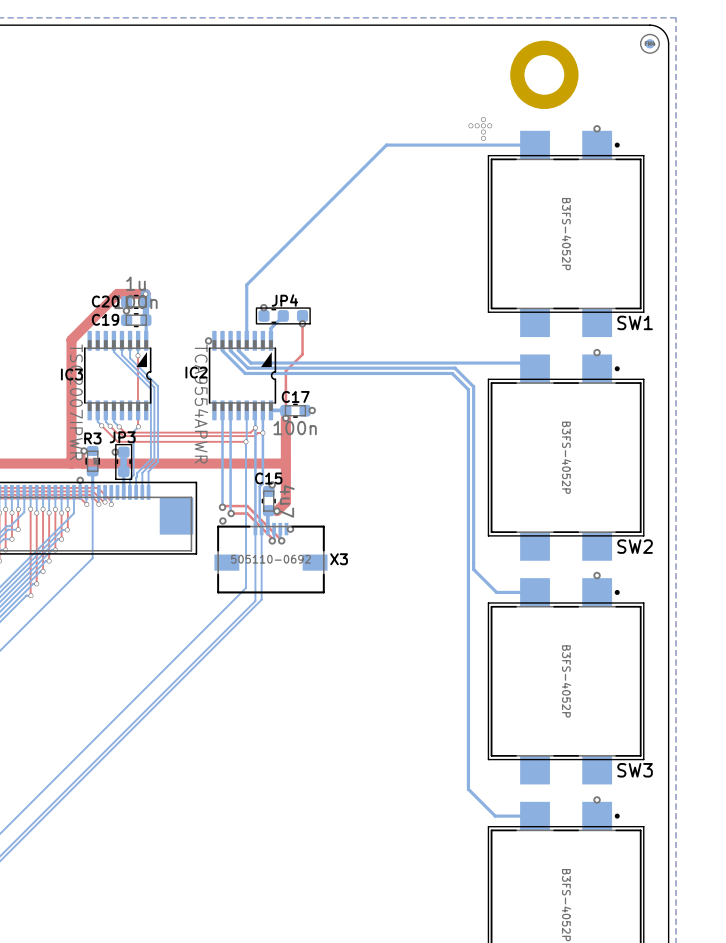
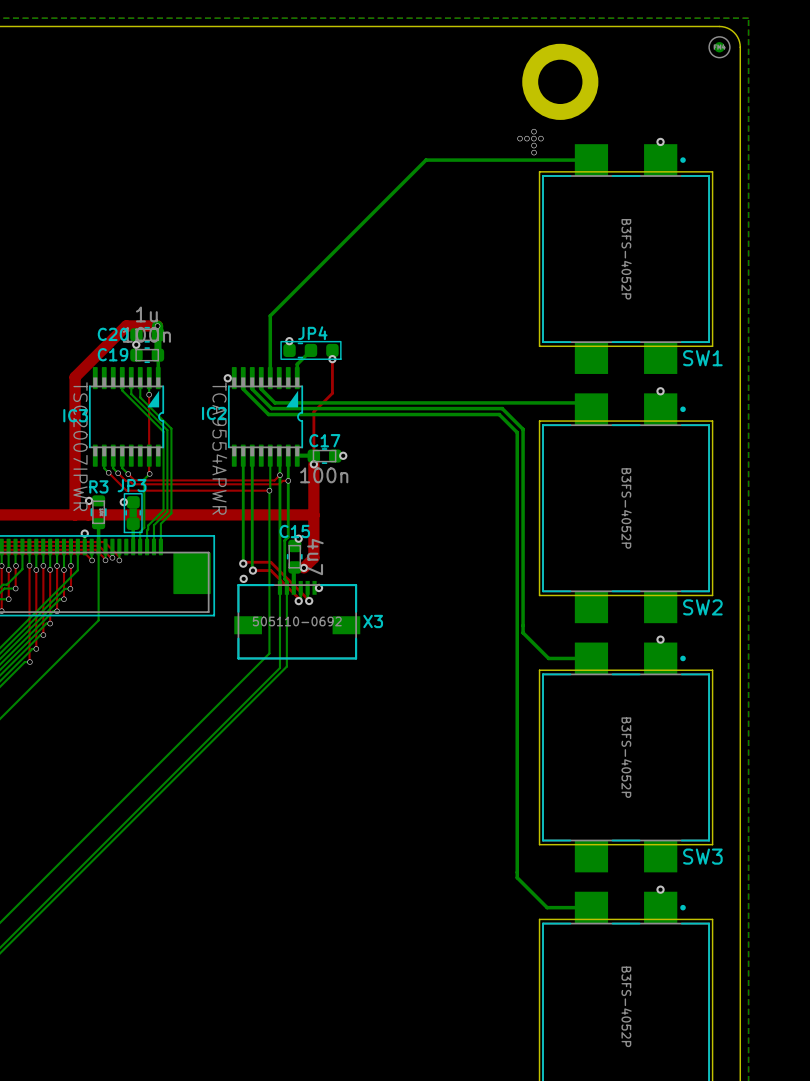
part position: (544, 74) -> (560, 81)

